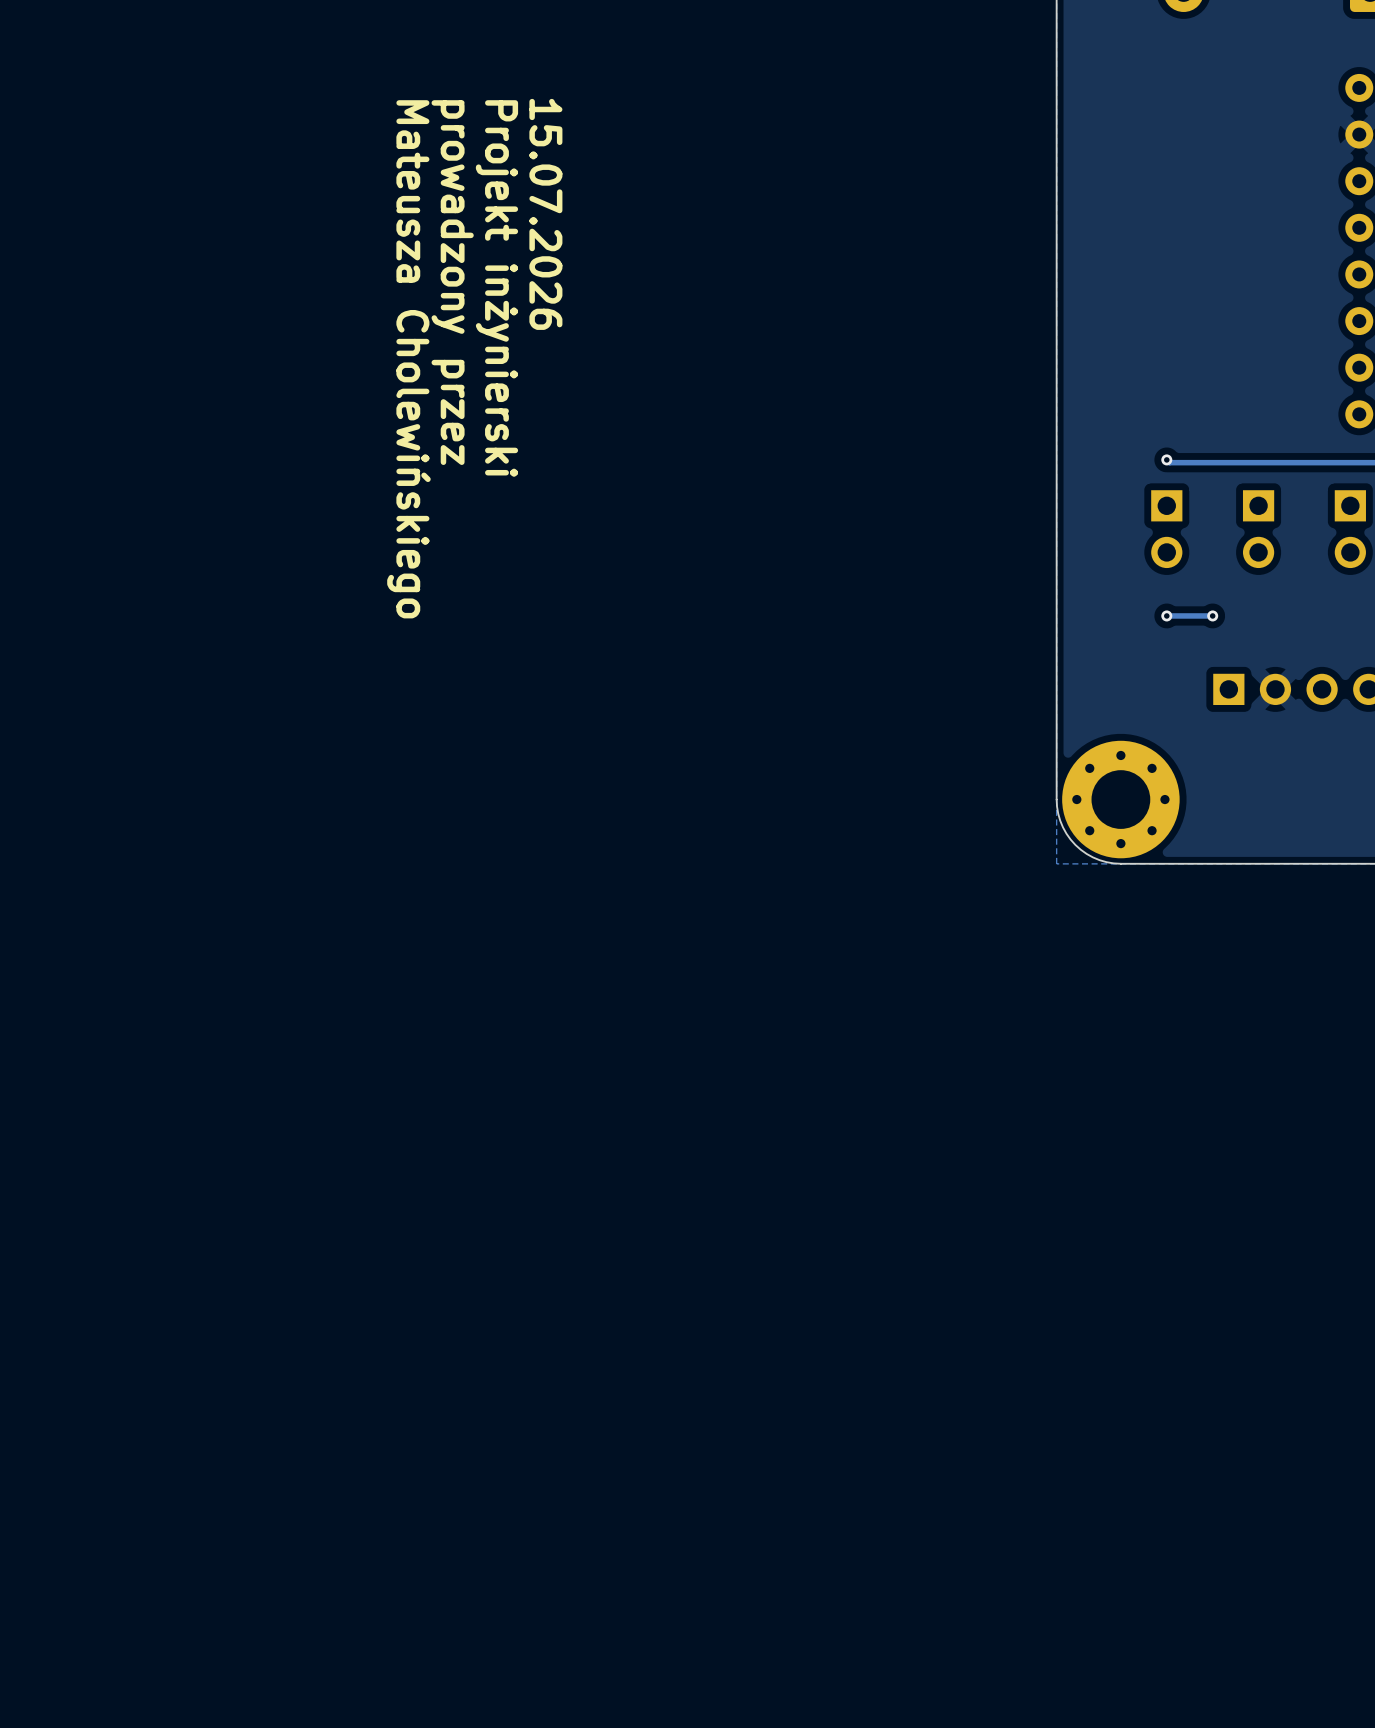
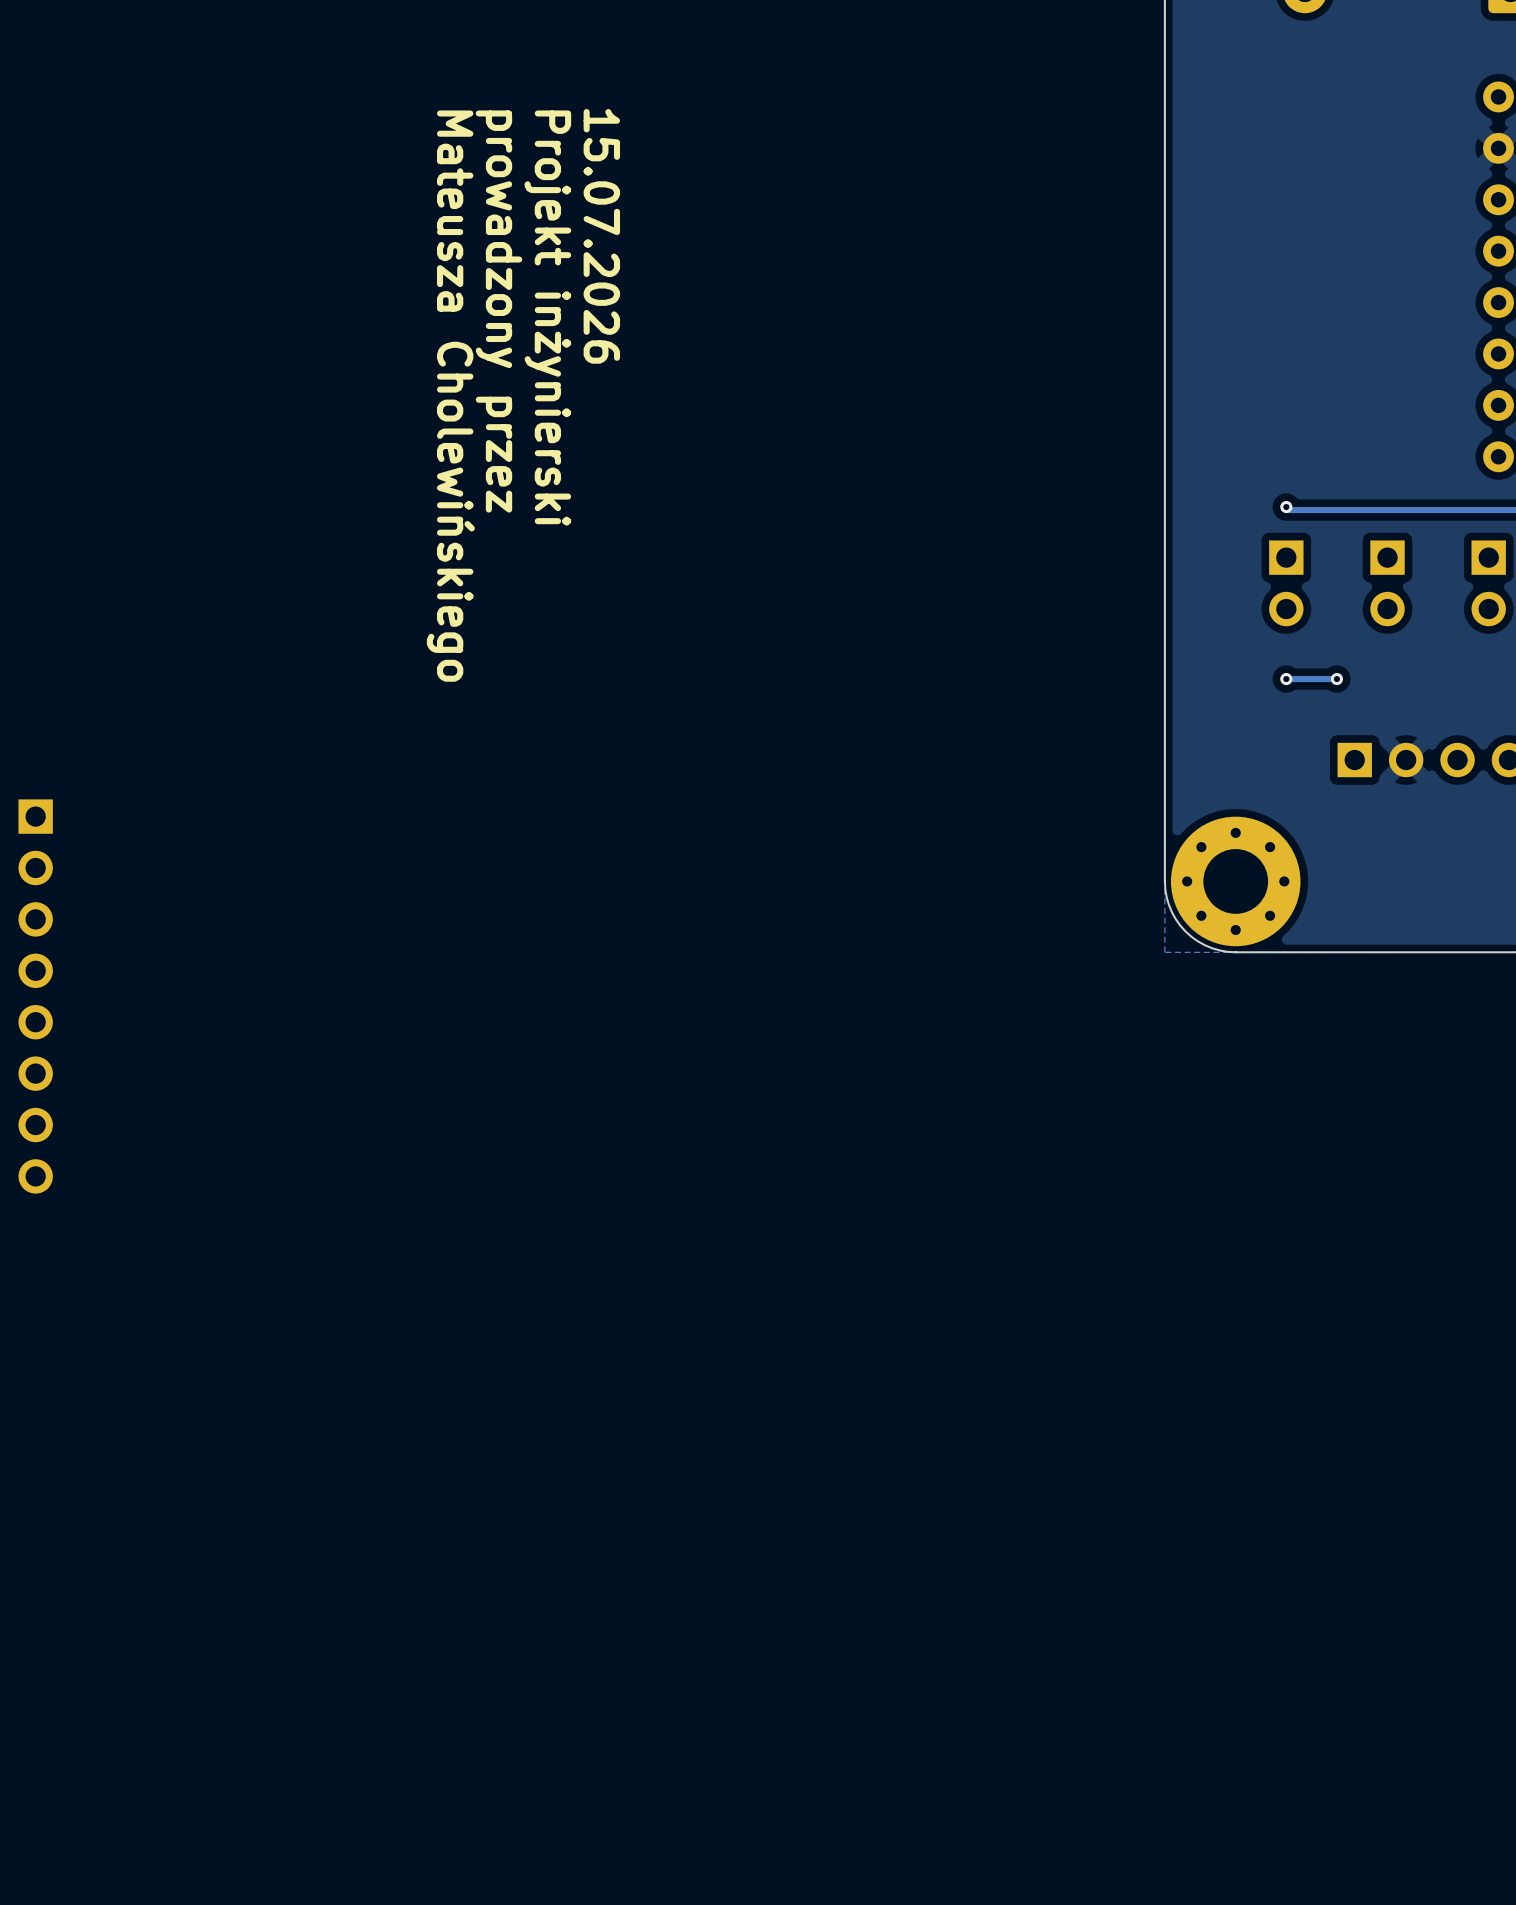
part: none -> (35, 996)

